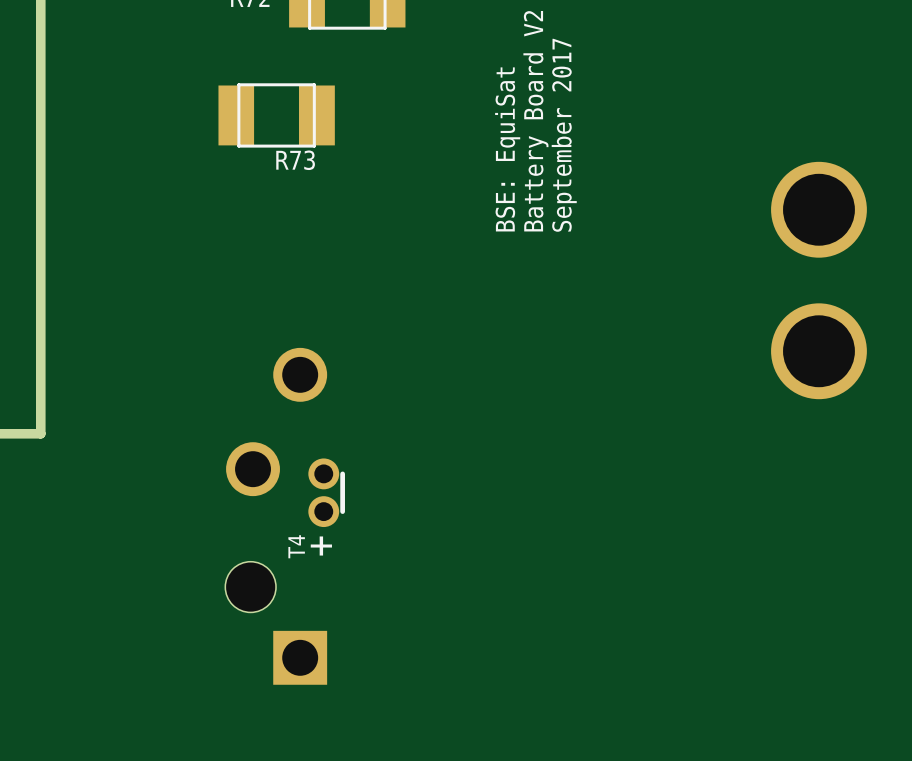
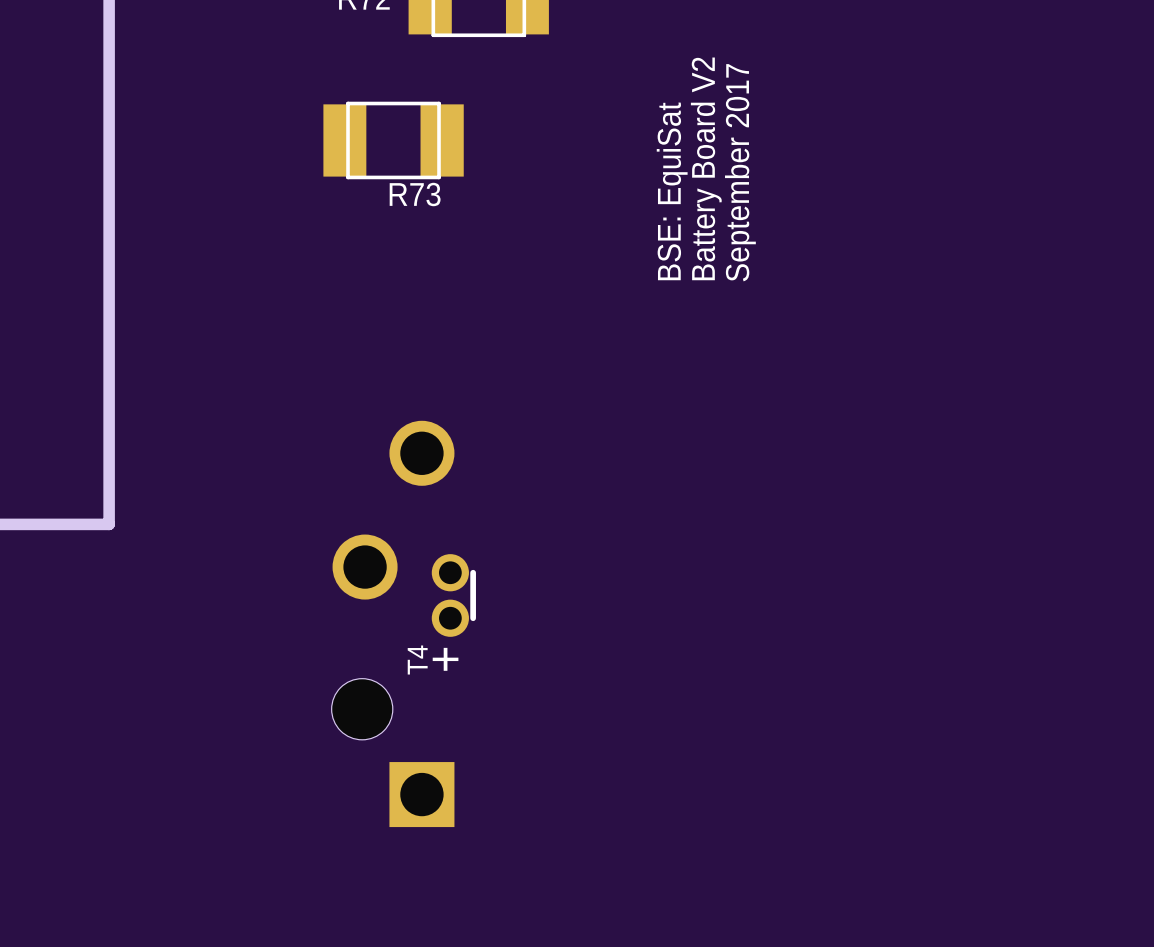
part: (818, 209) -> none
part: (818, 351) -> none

